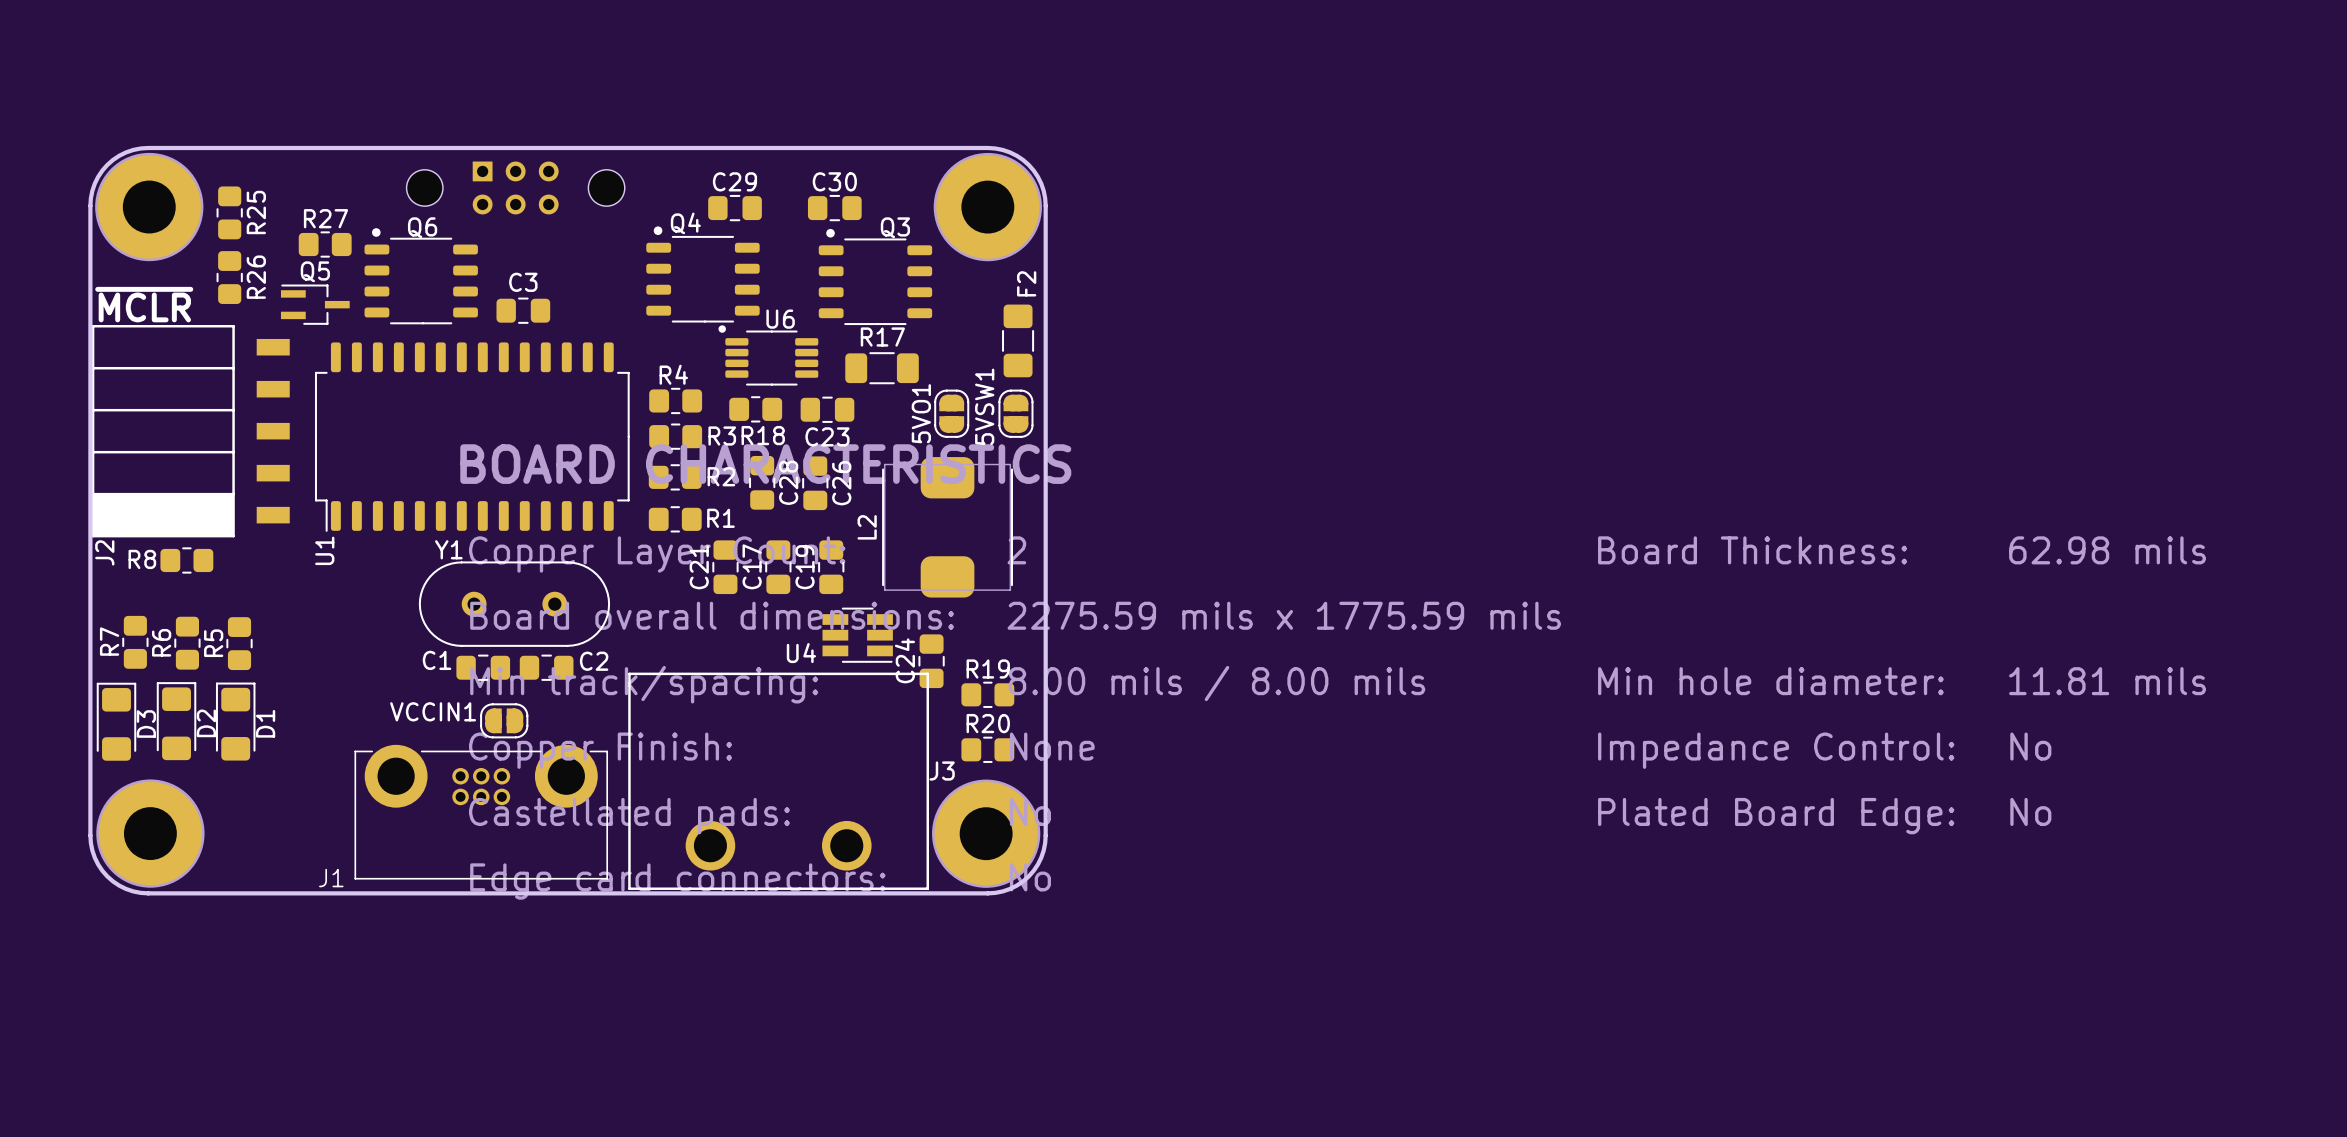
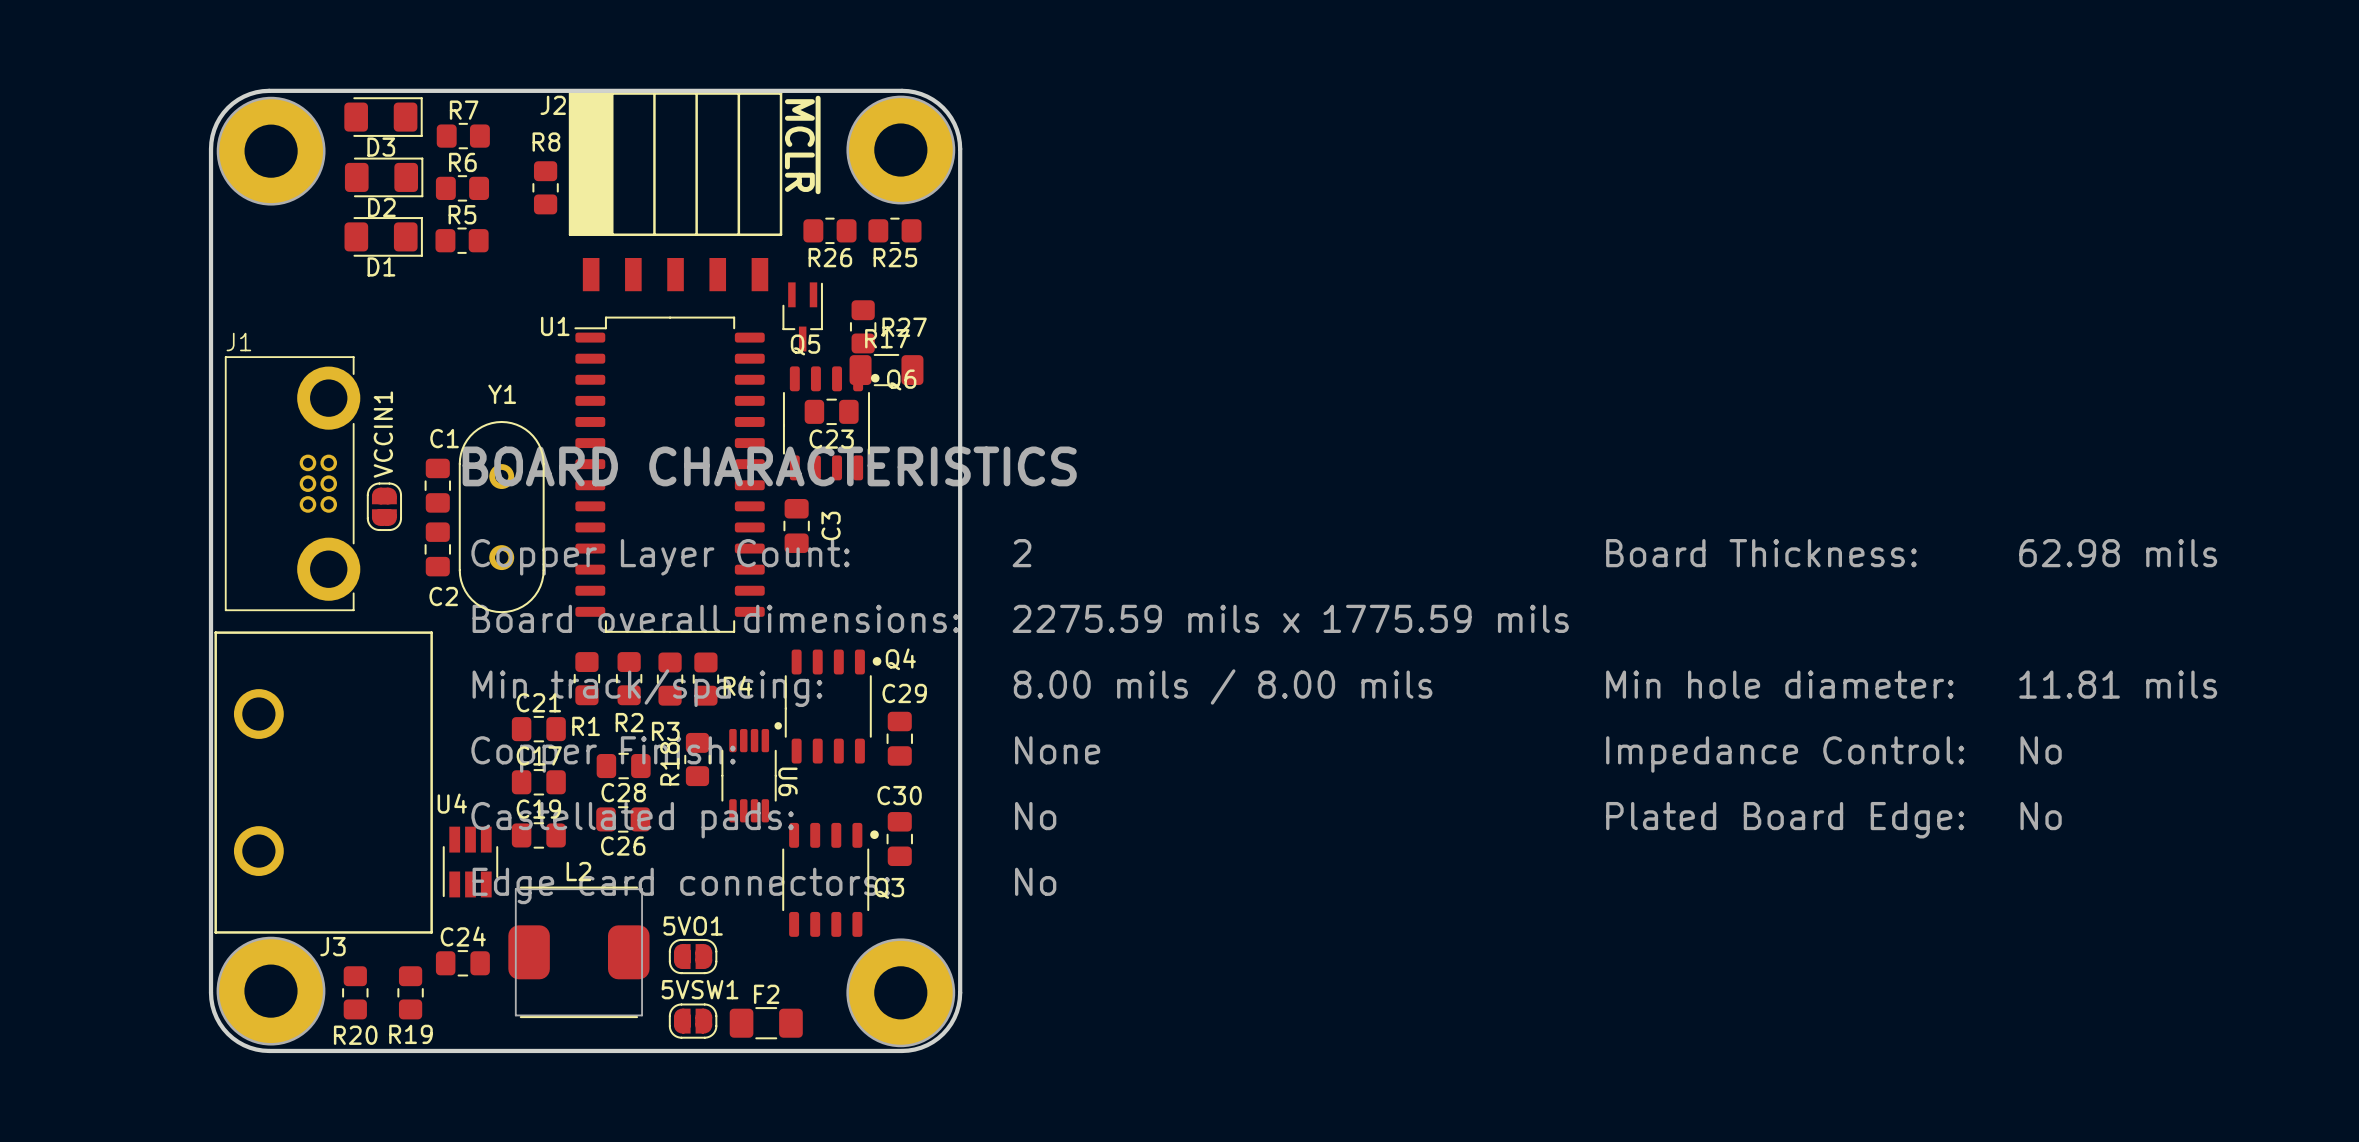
text: none -> ~{MCLR} (802, 144)
board edge: (148, 147) (987, 147) (1002, 149) (1023, 159) (1033, 170) (1041, 183) (1045, 205) (1045, 835) (1043, 850) (1033, 870) (1016, 885) (1002, 891) (987, 893) (148, 893) (133, 891) (113, 881) (98, 864) (92, 850) (90, 835) (90, 205) (94, 183) (107, 164) (126, 152) (148, 147) -> (269, 90) (249, 94) (228, 107) (216, 123) (211, 148) (211, 992) (214, 1012) (219, 1023) (232, 1038) (243, 1045) (269, 1050) (902, 1050) (914, 1049) (932, 1042) (951, 1023) (958, 1005) (960, 992) (960, 148) (956, 129) (951, 118) (932, 99) (921, 94) (902, 90) (269, 90)
part: (515, 187) -> none
part position: (149, 207) -> (271, 151)
part position: (987, 207) -> (900, 150)
C29 rotation: 0° (735, 208) -> 90° clockwise (899, 738)
C29 position: (735, 208) -> (899, 738)
C30 rotation: 0° (834, 208) -> 90° clockwise (899, 839)
C30 position: (834, 208) -> (899, 839)
R25 rotation: 0° (229, 212) -> 90° clockwise (894, 230)
R25 position: (229, 212) -> (894, 230)
Q4 name position: Q4 (685, 223) -> Q4 (900, 659)
Q6 name position: Q6 (422, 227) -> Q6 (901, 379)
R27 rotation: 0° (325, 244) -> 90° clockwise (863, 326)
R27 position: (325, 244) -> (863, 326)
Q5 name position: Q5 (315, 271) -> Q5 (805, 344)
Q4 rotation: 0° (702, 274) -> 90° clockwise (833, 706)
Q4 position: (702, 274) -> (833, 706)
Q6 rotation: 0° (421, 276) -> 90° clockwise (831, 423)
Q6 position: (421, 276) -> (831, 423)
Q3 rotation: 0° (875, 276) -> 90° clockwise (830, 879)
Q3 position: (875, 276) -> (830, 879)
R26 rotation: 0° (229, 277) -> 90° clockwise (829, 230)
R26 position: (229, 277) -> (829, 230)
text: ~{MCLR} (144, 304) -> none
Q5 rotation: 0° (315, 304) -> 90° clockwise (802, 316)
Q5 position: (315, 304) -> (802, 316)
C3 rotation: 0° (523, 310) -> 90° clockwise (796, 525)
C3 position: (523, 310) -> (796, 525)
F2 rotation: 0° (1018, 340) -> 90° clockwise (766, 1023)
F2 position: (1018, 340) -> (766, 1023)
U6 rotation: 0° (768, 355) -> 90° clockwise (751, 772)
U6 position: (768, 355) -> (751, 772)
R4 rotation: 0° (675, 400) -> 90° clockwise (705, 679)
R4 position: (675, 400) -> (705, 679)
R18 rotation: 0° (755, 409) -> 90° clockwise (697, 759)
R18 position: (755, 409) -> (697, 759)
5VO1 rotation: 0° (951, 413) -> 90° clockwise (693, 956)
5VO1 position: (951, 413) -> (693, 956)
5VSW1 rotation: 0° (1015, 413) -> 90° clockwise (693, 1021)
5VSW1 position: (1015, 413) -> (693, 1021)
J2 rotation: 0° (190, 431) -> 90° clockwise (675, 191)
J2 position: (190, 431) -> (675, 191)
R3 rotation: 0° (675, 436) -> 90° clockwise (670, 679)
R3 position: (675, 436) -> (670, 679)
U1 rotation: 0° (472, 437) -> 90° clockwise (669, 474)
U1 position: (472, 437) -> (669, 474)
R2 rotation: 0° (675, 477) -> 90° clockwise (629, 678)
R2 position: (675, 477) -> (629, 678)
C28 rotation: 0° (762, 482) -> 90° clockwise (623, 766)
C28 position: (762, 482) -> (623, 766)
C26 rotation: 0° (815, 483) -> 90° clockwise (623, 819)
C26 position: (815, 483) -> (623, 819)
R1 rotation: 0° (675, 519) -> 90° clockwise (586, 678)
R1 position: (675, 519) -> (586, 678)
L2 rotation: 0° (947, 527) -> 90° clockwise (578, 952)
L2 position: (947, 527) -> (578, 952)
Y1 name position: Y1 (448, 549) -> Y1 (502, 394)
R8 rotation: 0° (186, 560) -> 90° clockwise (545, 187)
R8 position: (186, 560) -> (545, 187)
C21 rotation: 0° (725, 567) -> 90° clockwise (538, 729)
C21 position: (725, 567) -> (538, 729)
C17 rotation: 0° (778, 567) -> 90° clockwise (538, 782)
C17 position: (778, 567) -> (538, 782)
C19 rotation: 0° (831, 567) -> 90° clockwise (538, 835)
C19 position: (831, 567) -> (538, 835)
Y1 rotation: 0° (514, 604) -> 90° clockwise (501, 517)
U4 rotation: 0° (857, 635) -> 90° clockwise (470, 862)
U4 position: (857, 635) -> (470, 862)
R7 rotation: 0° (135, 642) -> 90° clockwise (463, 136)
R7 position: (135, 642) -> (463, 136)
R6 rotation: 0° (187, 643) -> 90° clockwise (462, 188)
R6 position: (187, 643) -> (462, 188)
R5 rotation: 0° (239, 643) -> 90° clockwise (462, 240)
R5 position: (239, 643) -> (462, 240)
C24 rotation: 0° (931, 661) -> 90° clockwise (462, 963)
C24 position: (931, 661) -> (462, 963)
C1 rotation: 0° (483, 667) -> 90° clockwise (437, 485)
C1 position: (483, 667) -> (437, 485)
C2 rotation: 0° (546, 667) -> 90° clockwise (437, 549)
C2 position: (546, 667) -> (437, 549)
R19 name position: R19 (988, 669) -> R19 (410, 1034)
R19 rotation: 0° (987, 694) -> 90° clockwise (410, 992)
R19 position: (987, 694) -> (410, 992)
VCCIN1 rotation: 0° (504, 720) -> 90° clockwise (384, 506)
VCCIN1 position: (504, 720) -> (384, 506)
D3 rotation: 0° (116, 721) -> 90° clockwise (383, 117)
D3 position: (116, 721) -> (383, 117)
D2 rotation: 0° (176, 721) -> 90° clockwise (384, 177)
D2 position: (176, 721) -> (384, 177)
D1 rotation: 0° (235, 721) -> 90° clockwise (383, 236)
D1 position: (235, 721) -> (383, 236)
R20 name position: R20 (988, 723) -> R20 (355, 1035)
R20 rotation: 0° (987, 749) -> 90° clockwise (355, 992)
R20 position: (987, 749) -> (355, 992)
J3 rotation: 0° (778, 781) -> 90° clockwise (323, 782)
J3 position: (778, 781) -> (323, 782)
J1 rotation: 0° (481, 812) -> 90° clockwise (292, 483)
J1 position: (481, 812) -> (292, 483)
part position: (150, 833) -> (270, 991)
part position: (986, 833) -> (900, 992)

